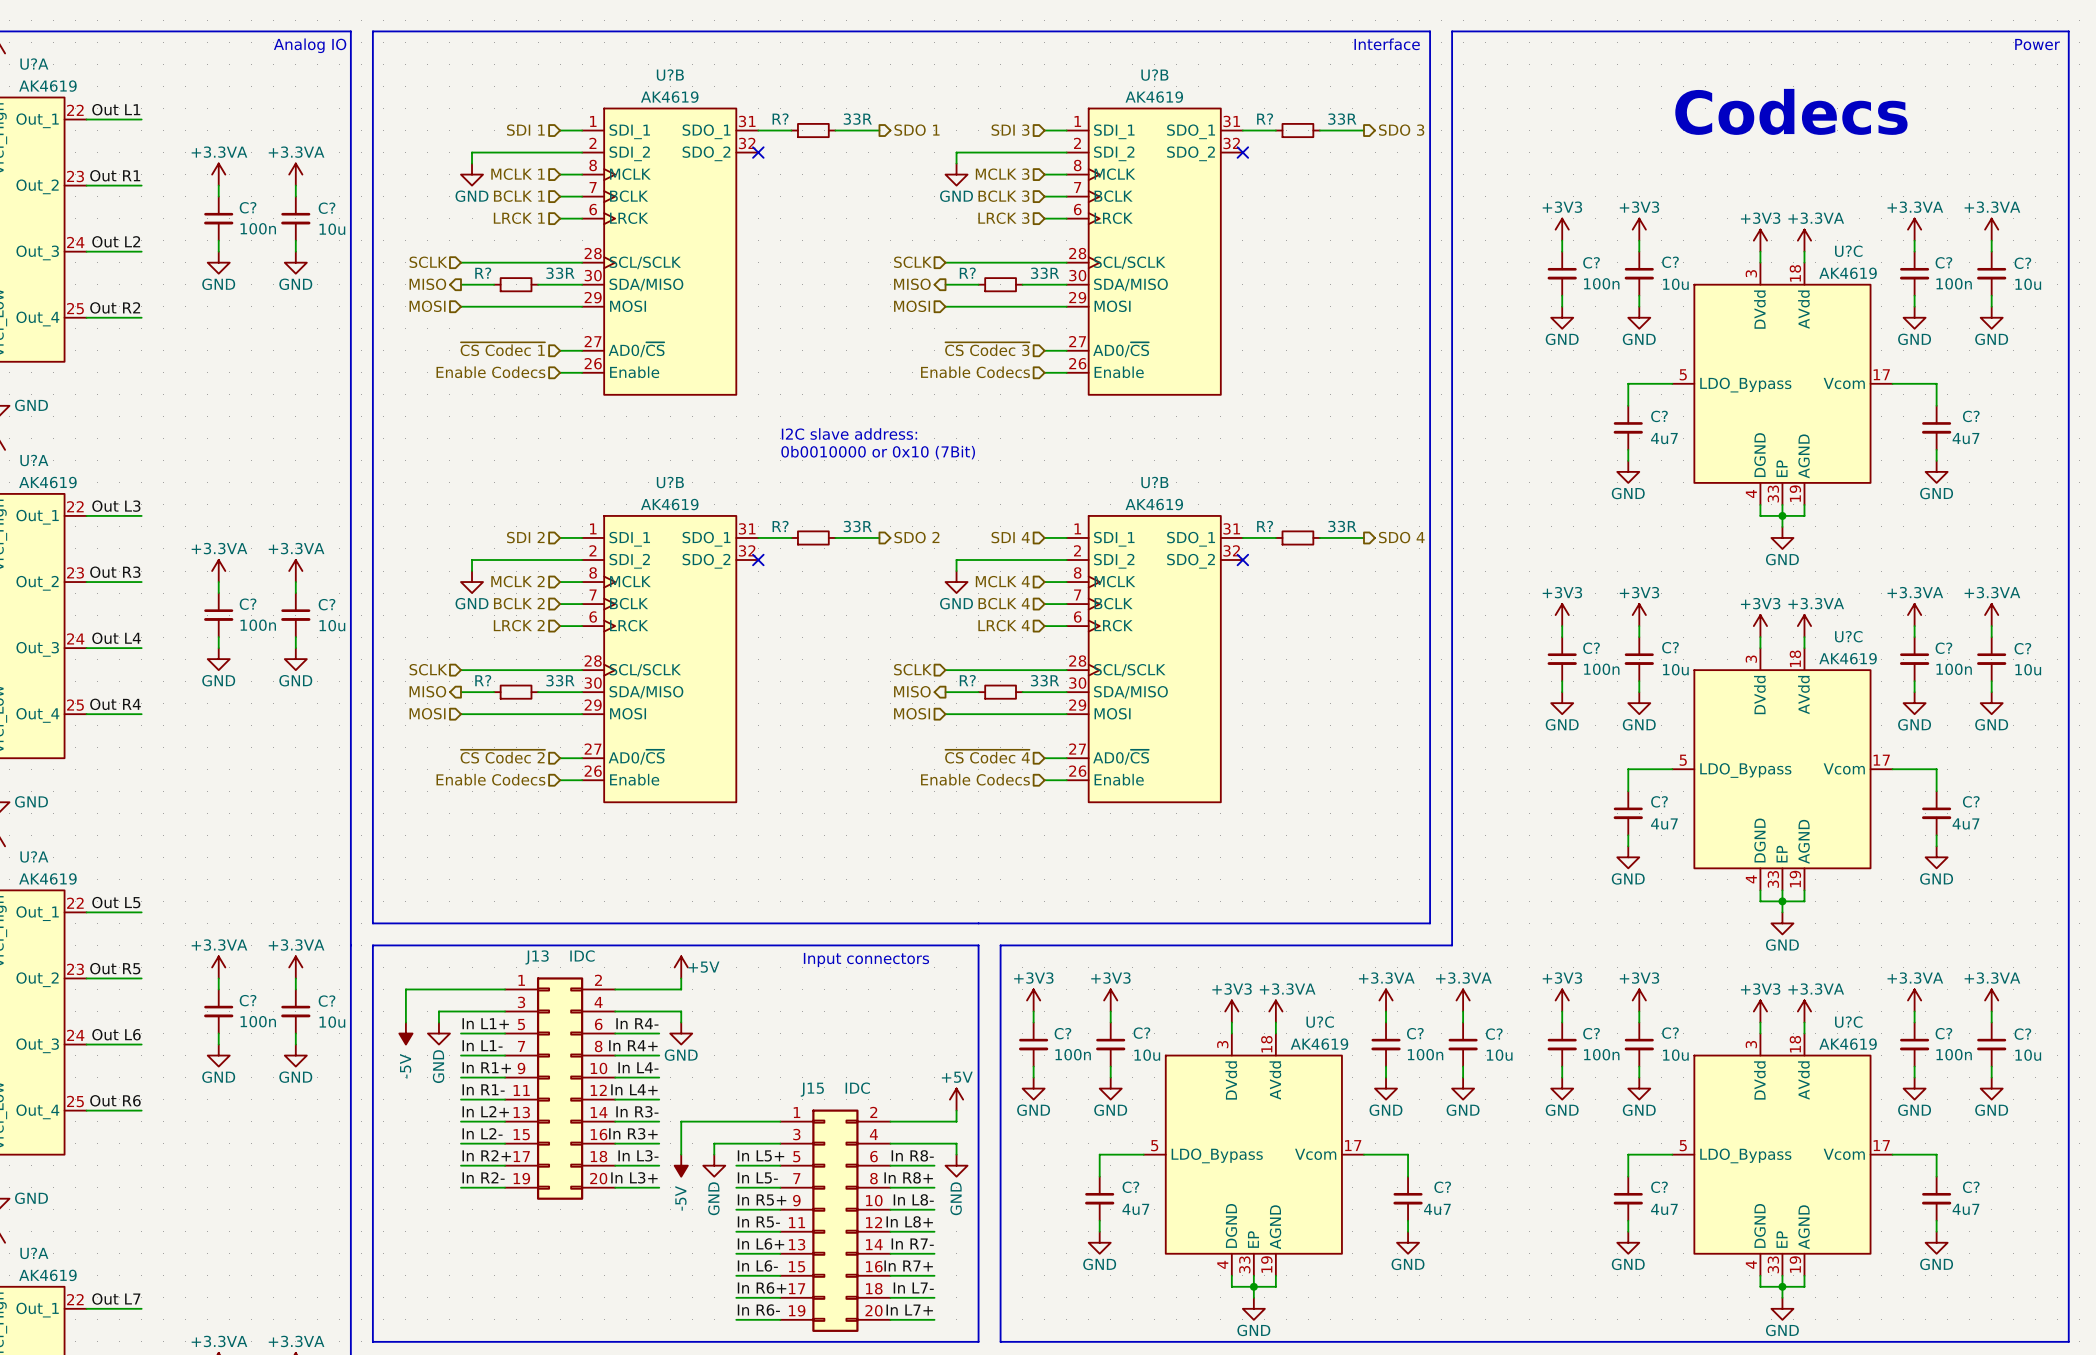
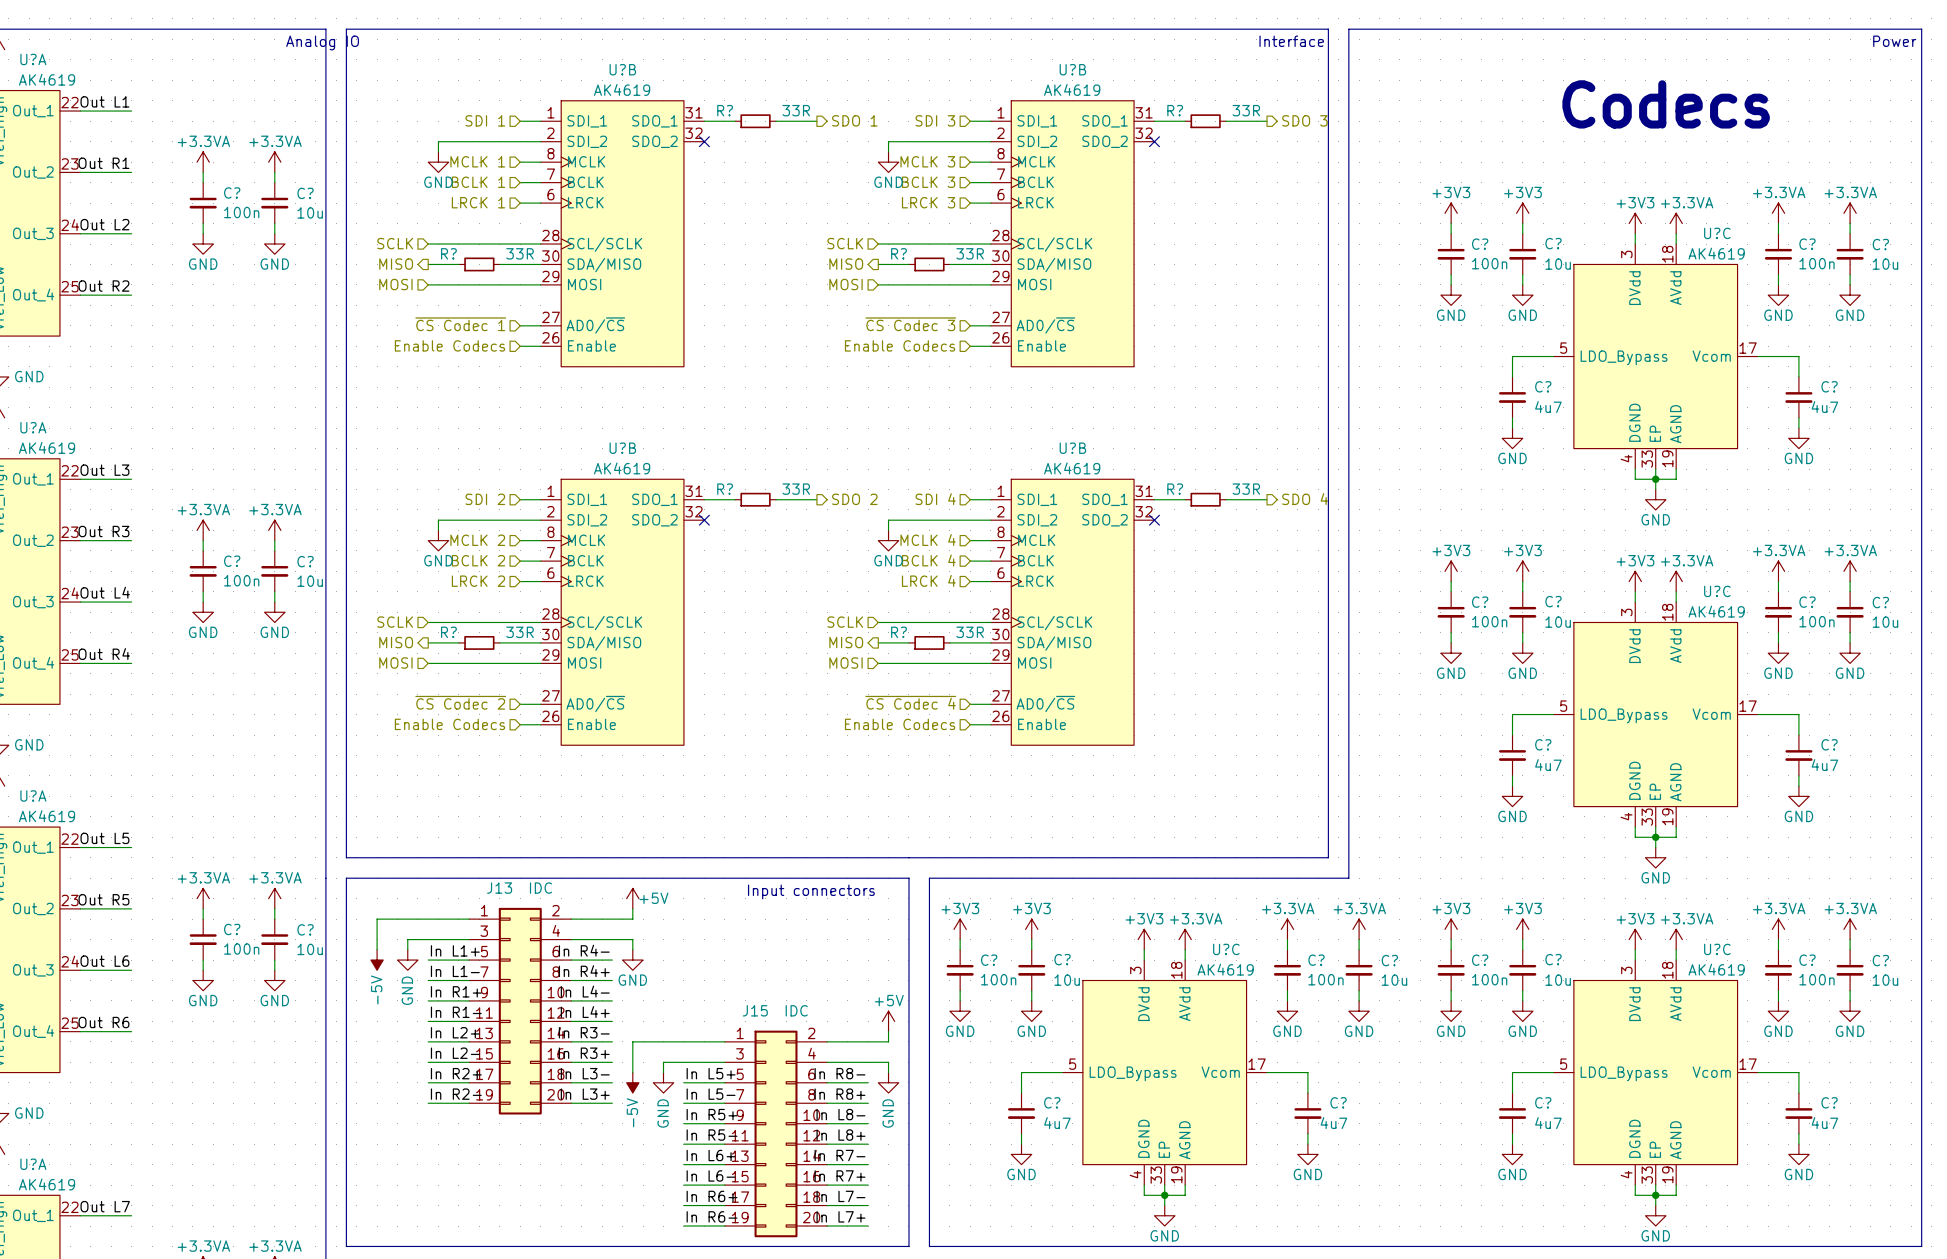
text position: Analog IO (310, 45) -> Analog IO (322, 42)
text: I2C slave address: (849, 434) -> none
text: 0b0010000 or 0x10 (7Bit) (878, 452) -> none

